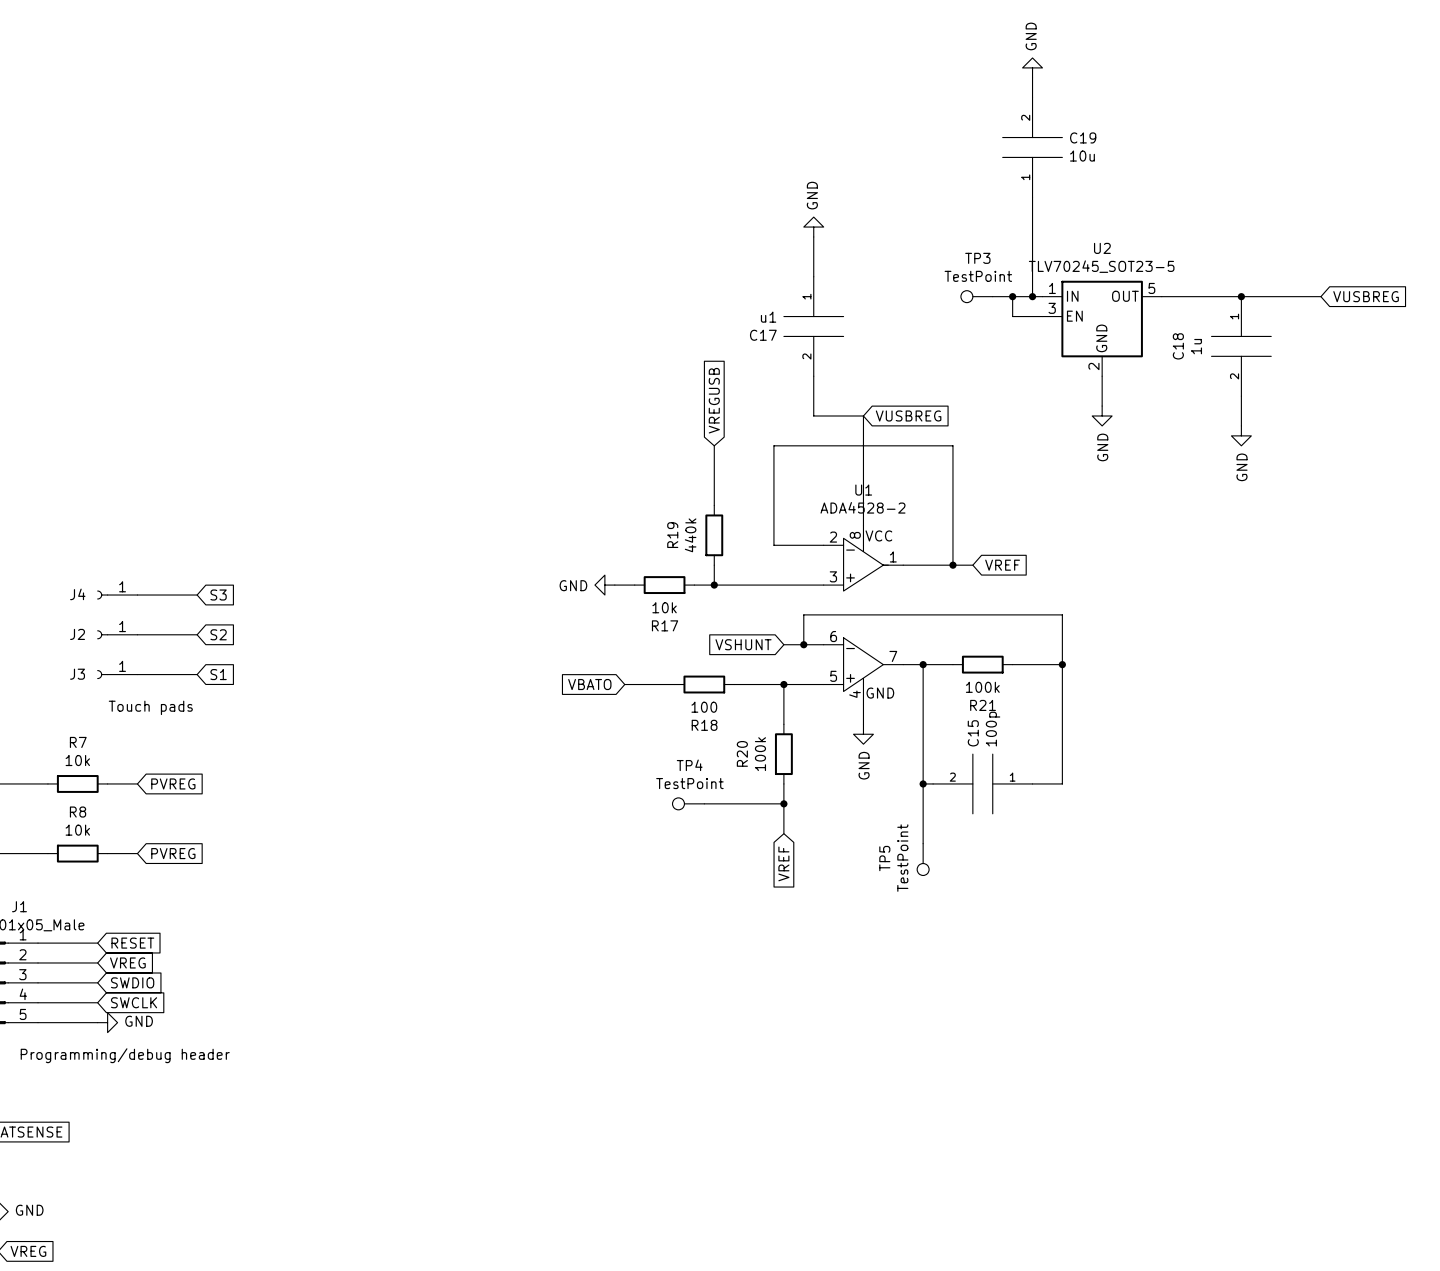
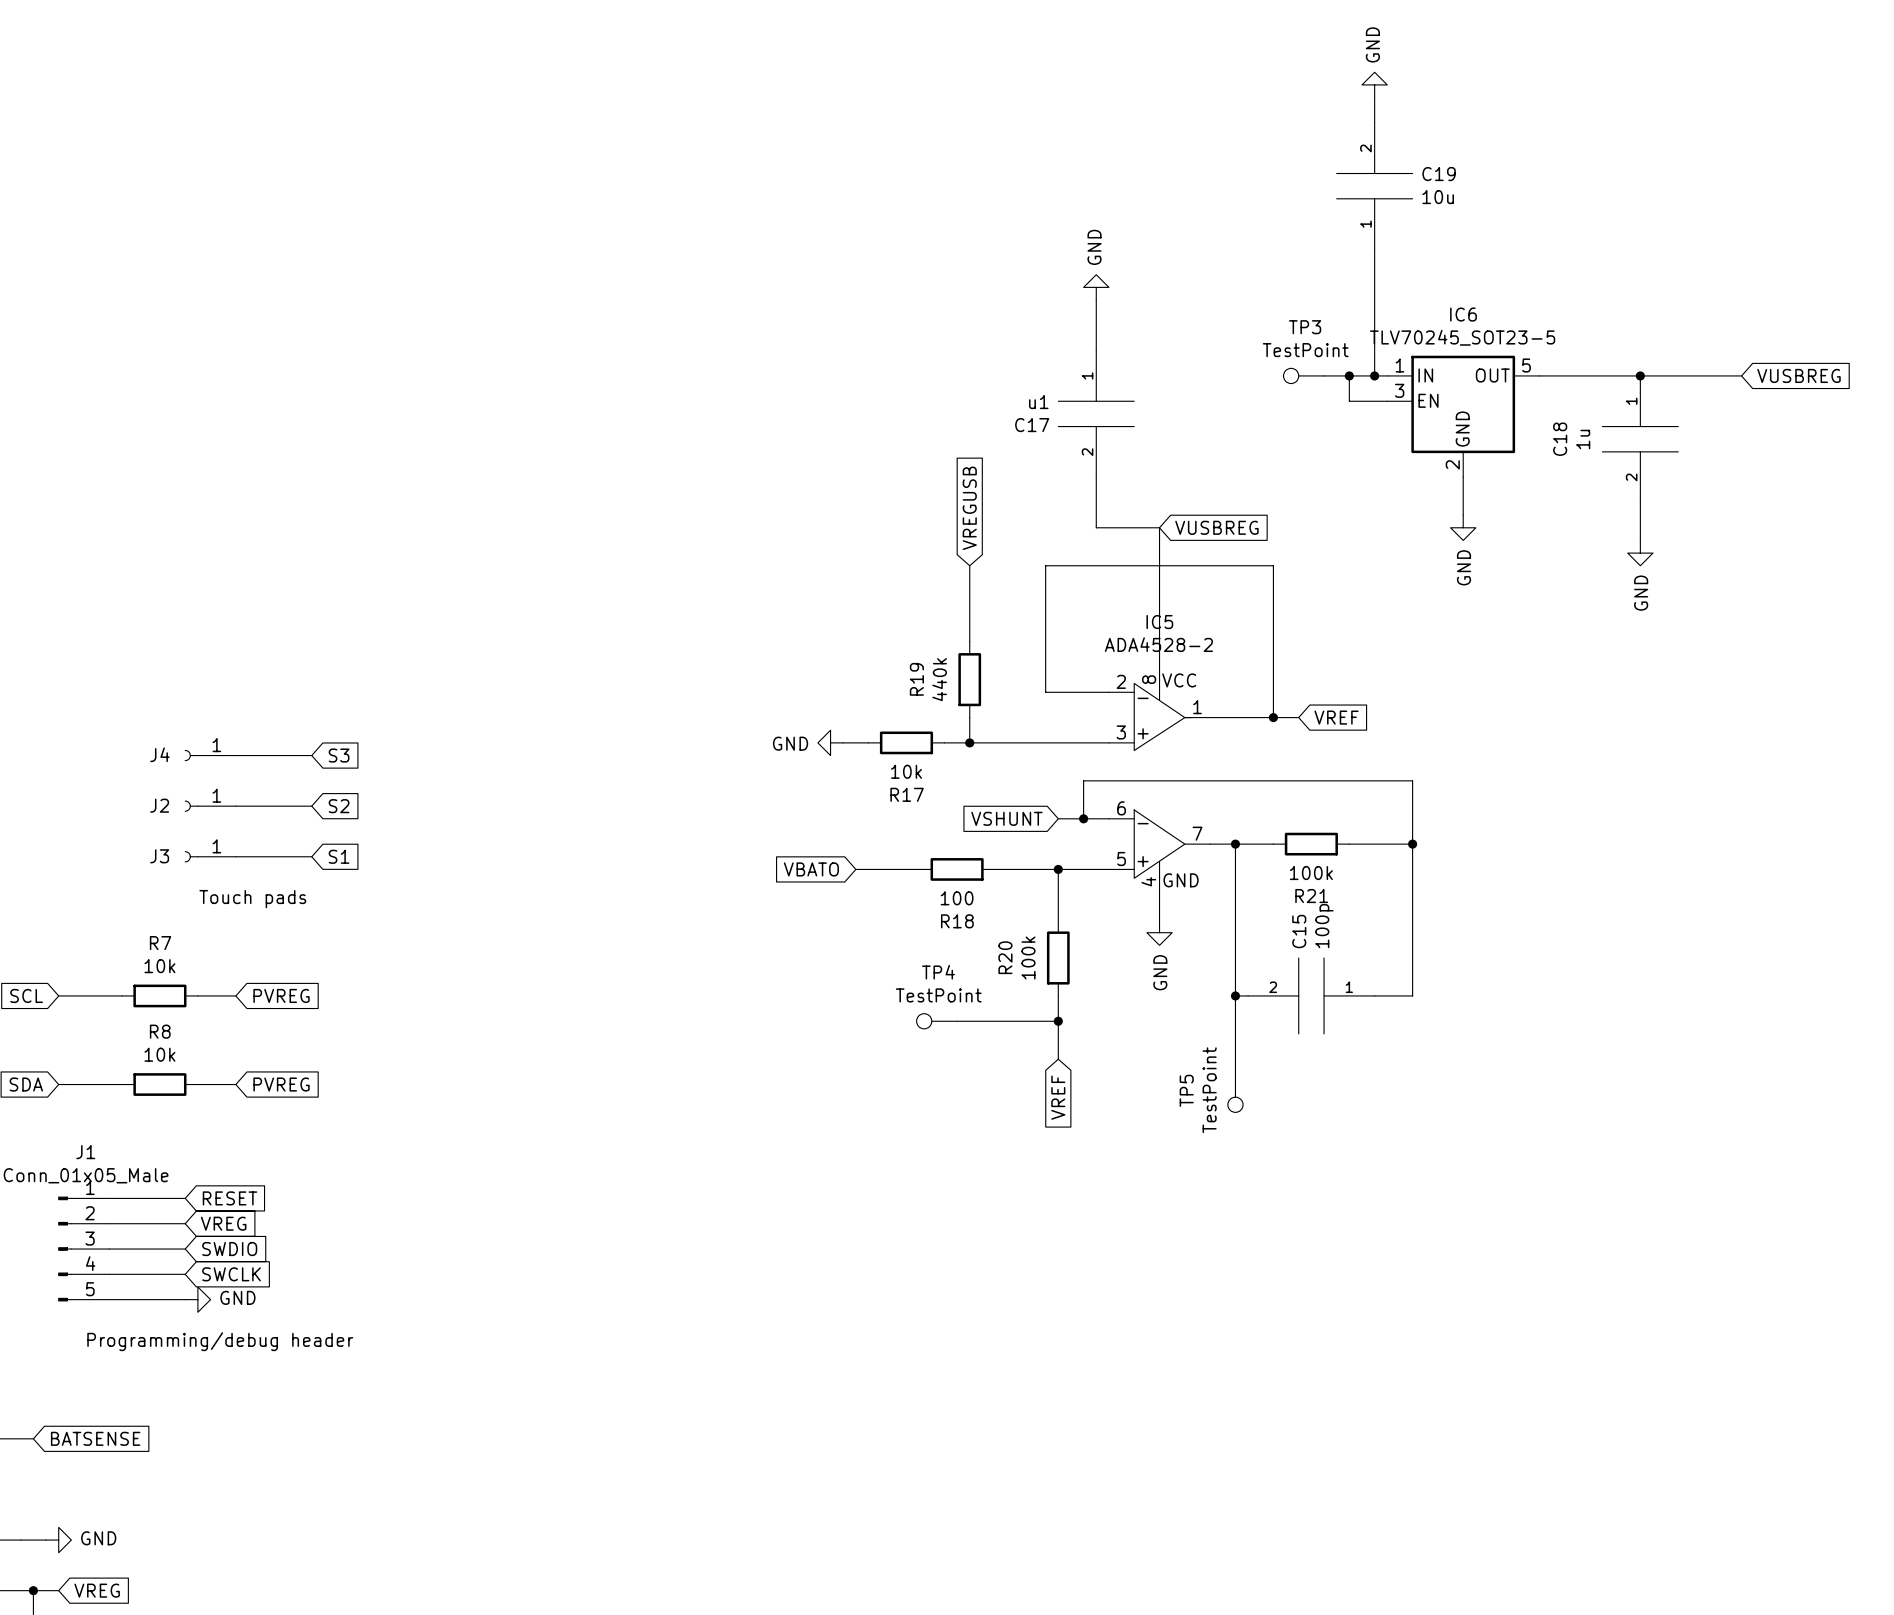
U2 name: U2 (1102, 248) -> IC6 (1463, 314)
U1 name: U1 (863, 490) -> IC5 (1159, 622)

